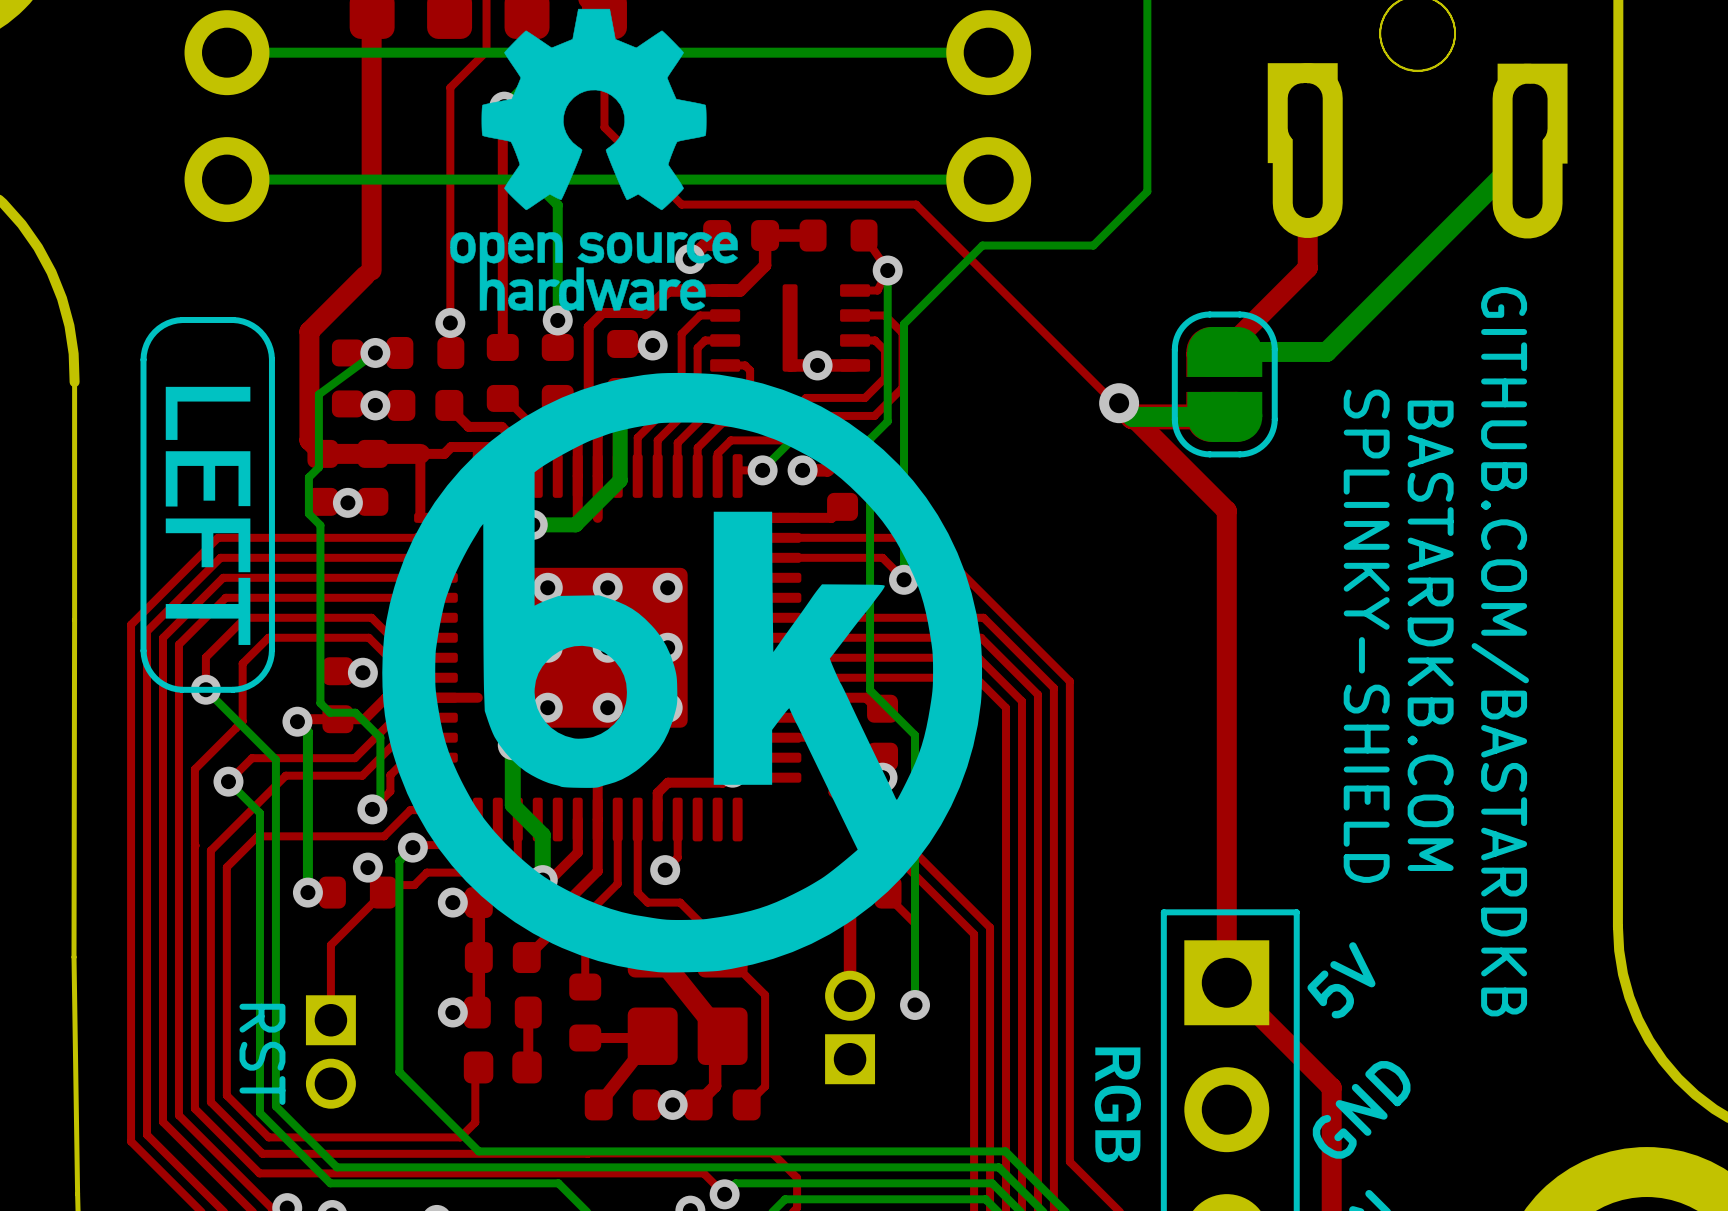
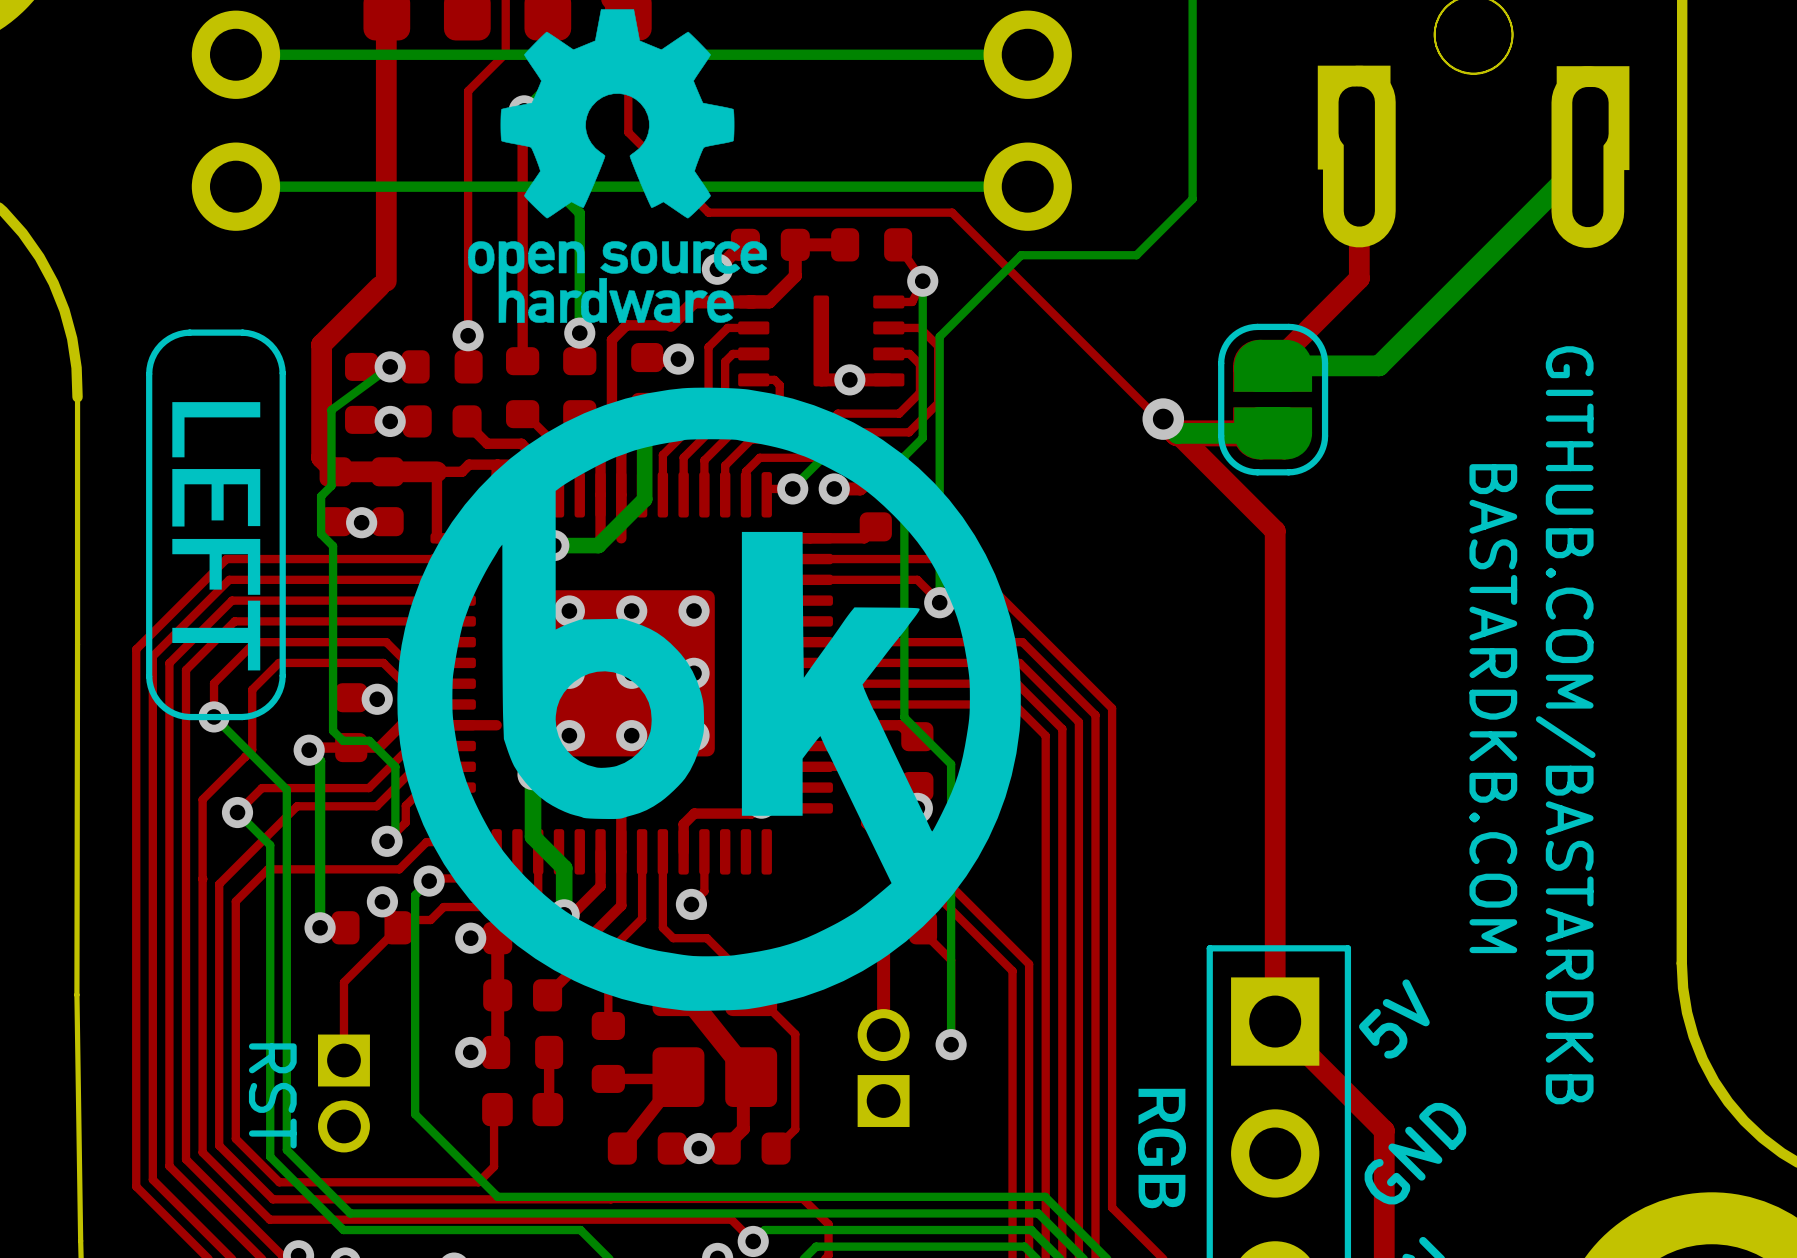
text position: BASTARDKB.COM (1430, 635) -> BASTARDKB.COM (1493, 708)
text: SPLINKY-SHIELD (1366, 636) -> none
text position: GITHUB.COM/BASTARDKB (1500, 651) -> GITHUB.COM/BASTARDKB (1565, 725)

